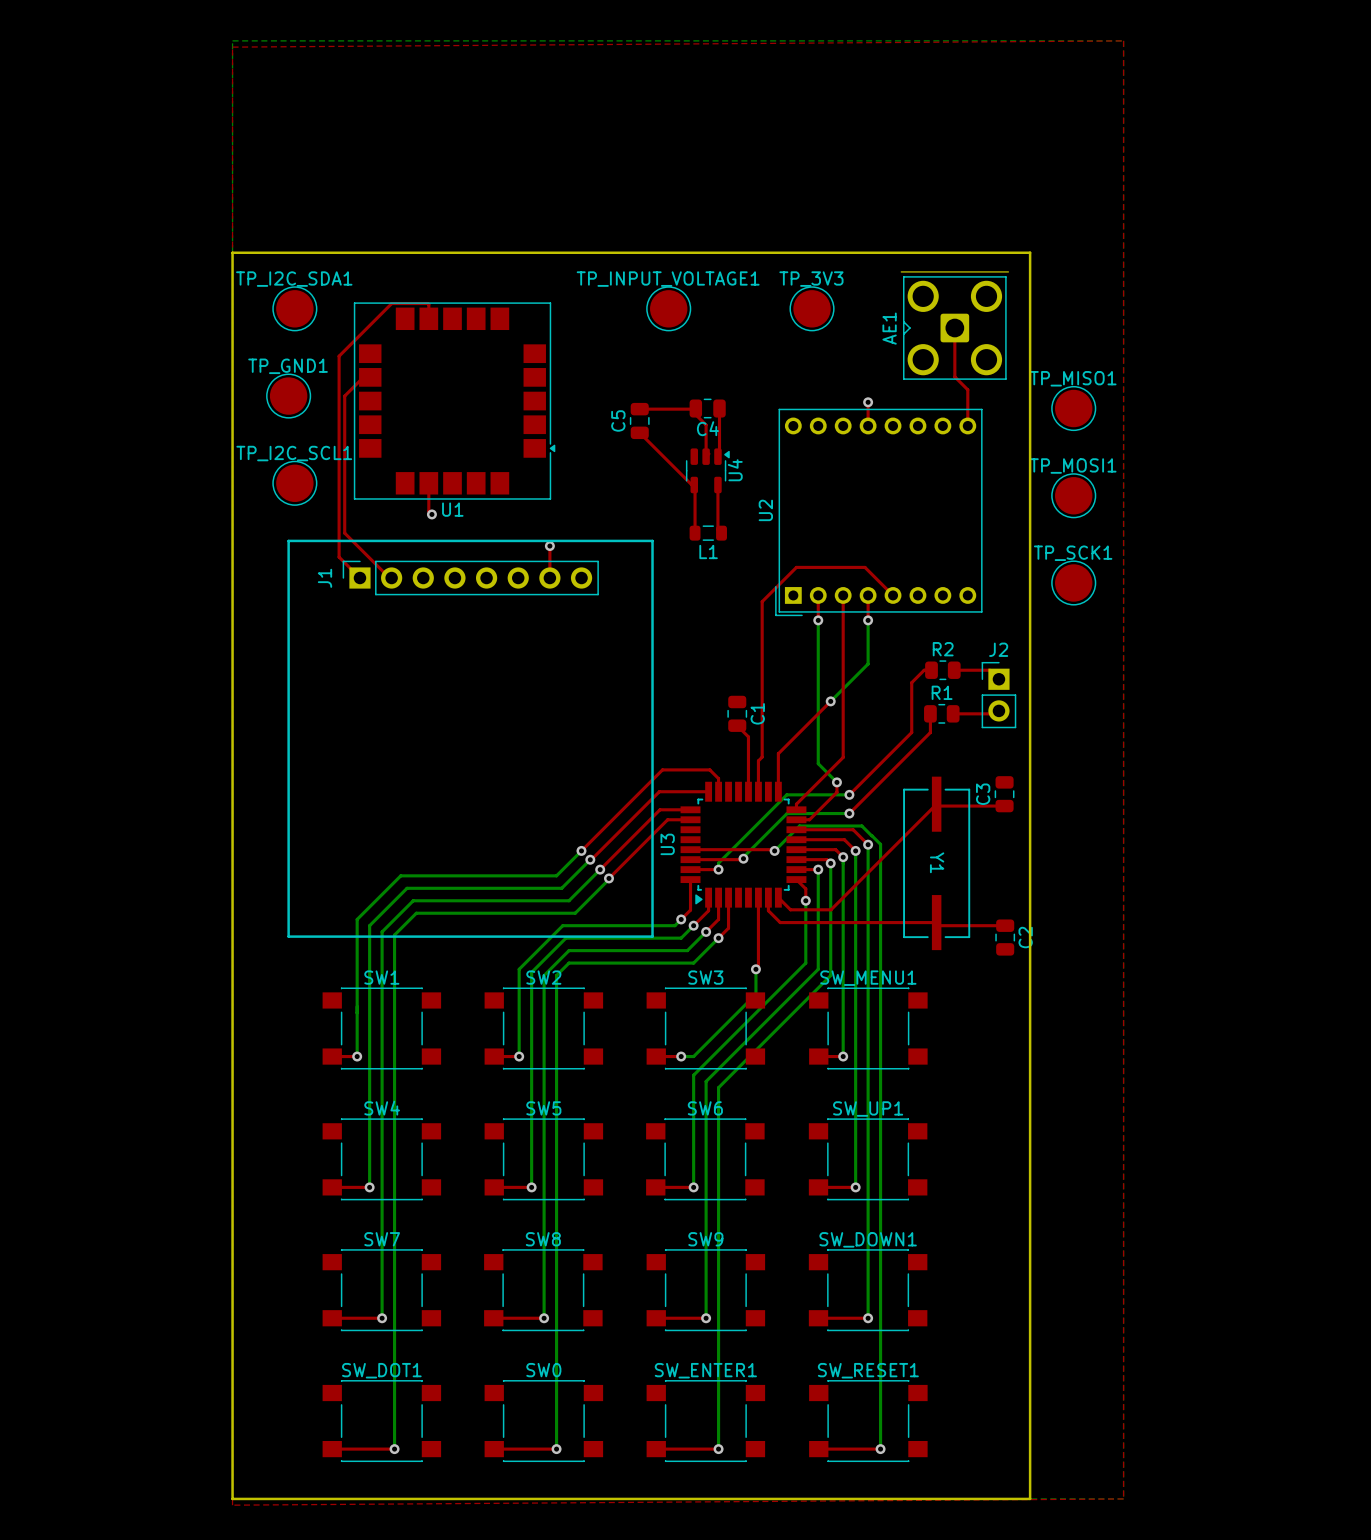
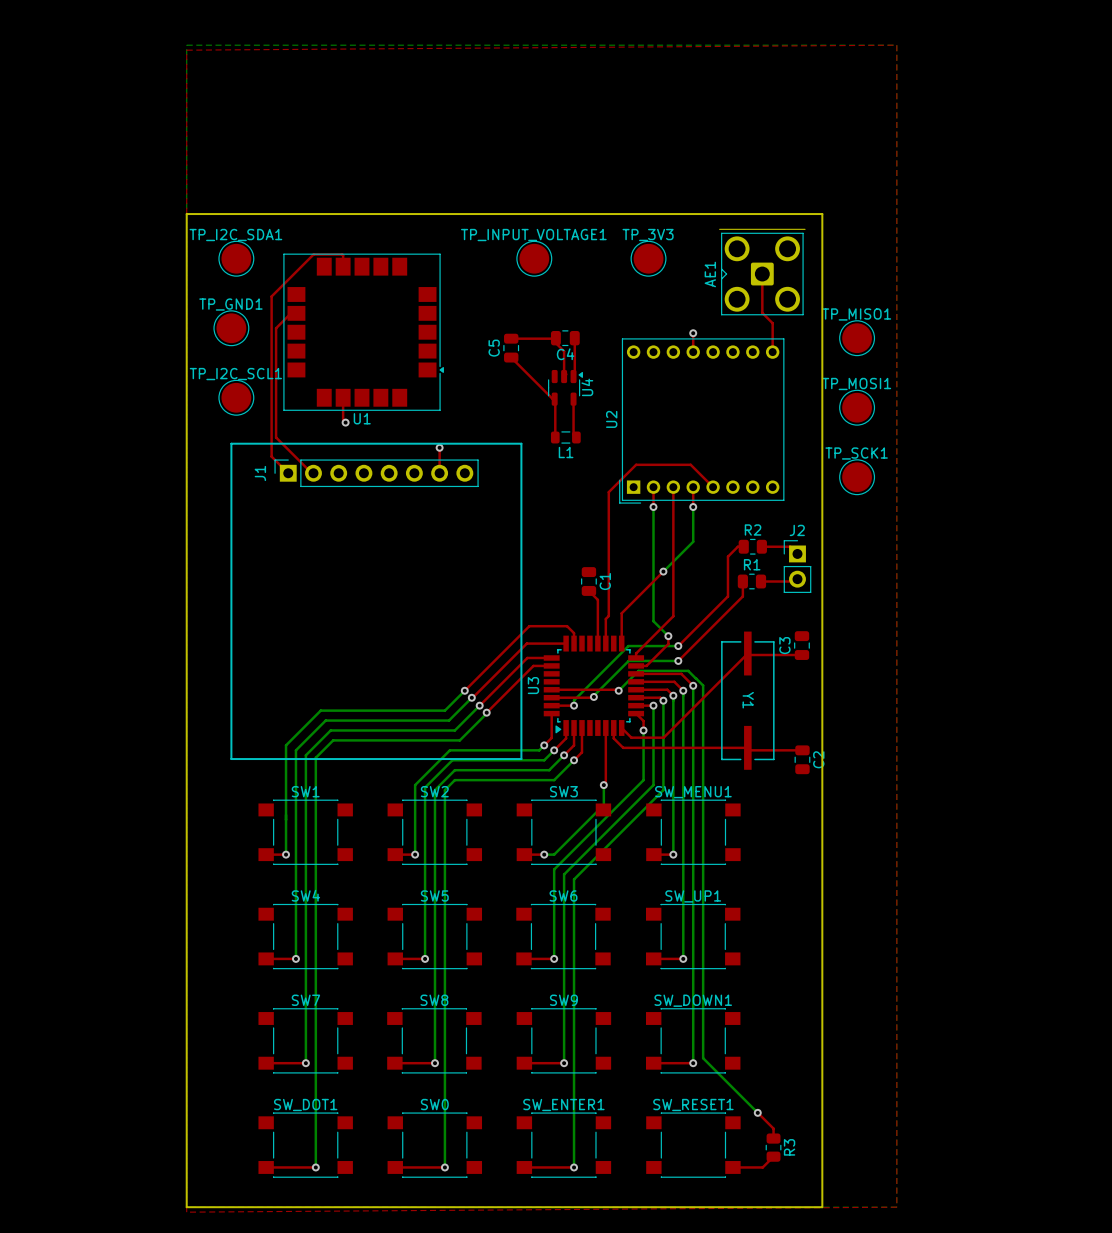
bottom track: (880, 1312) (880, 1449) -> (703, 1058) (757, 1112)
top track: none -> (757, 1112) (773, 1128) (773, 1138)
via: none -> (757, 1112)
R3: none -> (773, 1147)
top track: none -> (773, 1156) (762, 1167) (732, 1167)
top track: (818, 1449) (880, 1449) -> none
via: (880, 1449) -> none

